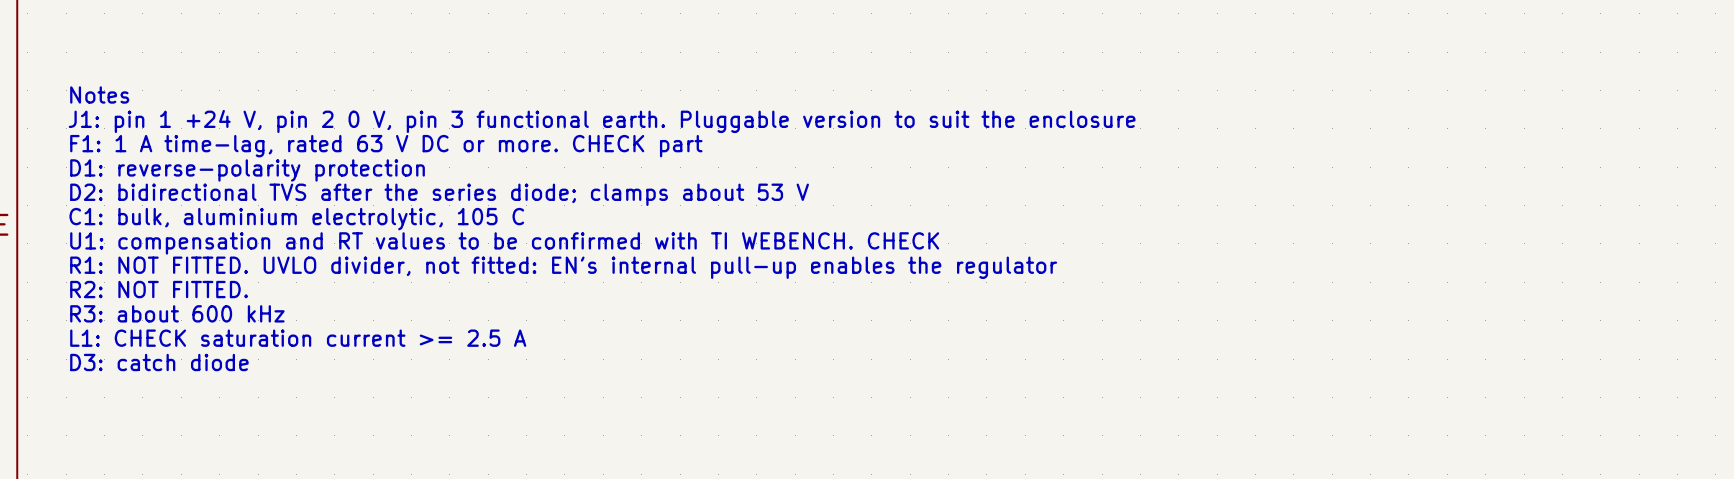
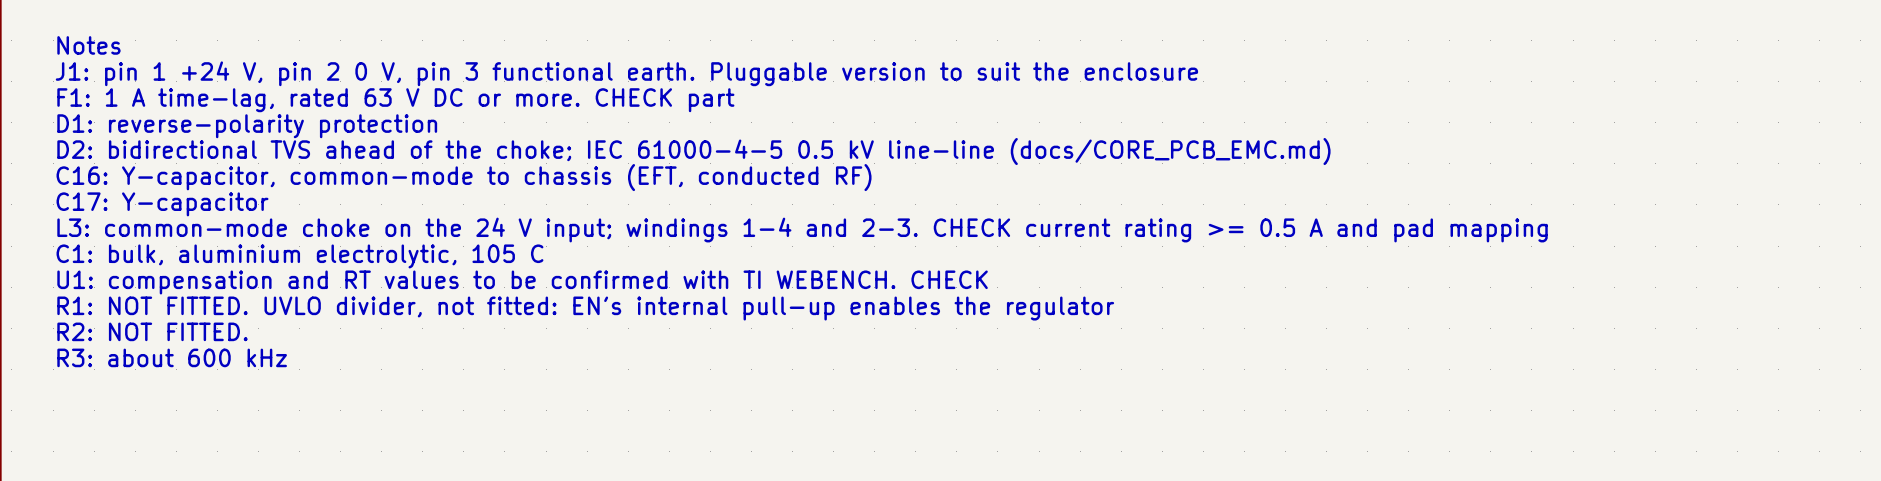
text: D2: bidirectional TVS after the series diode; clamps about 53 V (439, 194) -> D2: bidirectional TVS ahead of the choke; IEC 61000-4-5 0.5 kV line-line (docs/CORE_PCB_EMC.md) (693, 151)
text: C1: bulk, aluminium electrolytic, 105 C (296, 219) -> C16: Y-capacitor, common-mode to chassis (EFT, conducted RF) (464, 177)
text: U1: compensation and RT values to be confirmed with TI WEBENCH. CHECK (504, 243) -> C17: Y-capacitor (162, 204)
text: R1: NOT FITTED. UVLO divider, not fitted: EN's internal pull-up enables the regulator (563, 267) -> L3: common-mode choke on the 24 V input; windings 1-4 and 2-3. CHECK current rating >= 0.5 A and pad mapping (802, 230)
text: R2: NOT FITTED. (159, 289) -> C1: bulk, aluminium electrolytic, 105 C (299, 256)
text: R3: about 600 kHz (177, 313) -> U1: compensation and RT values to be confirmed with TI WEBENCH. CHECK (522, 282)
text: L1: CHECK saturation current >= 2.5 A (298, 338) -> R1: NOT FITTED. UVLO divider, not fitted: EN's internal pull-up enables the regulator (585, 308)
text: D3: catch diode (159, 362) -> R2: NOT FITTED. (152, 331)
text: none -> R3: about 600 kHz (172, 357)

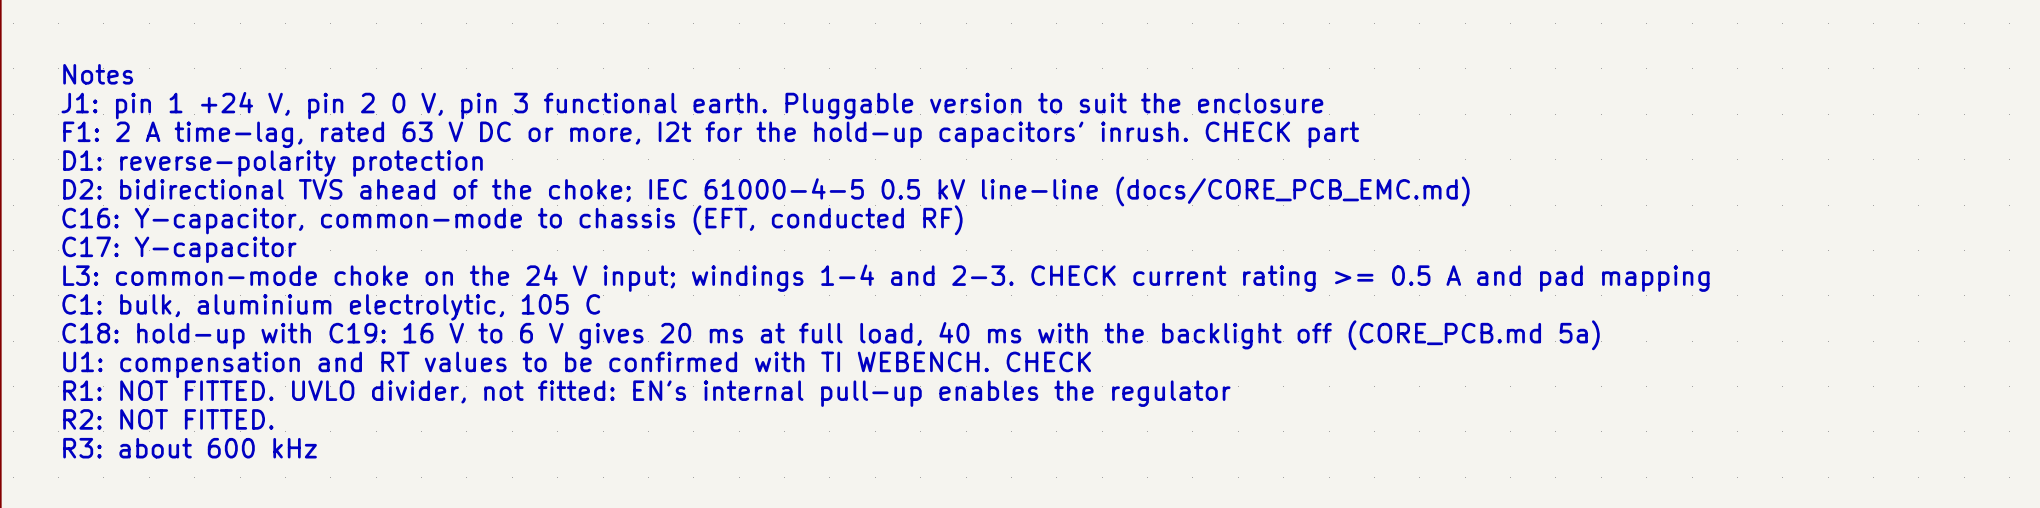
text: F1: 1 A time-lag, rated 63 V DC or more. CHECK part (395, 100) -> F1: 2 A time-lag, rated 63 V DC or more, I2t for the hold-up capacitors' inrush. CHECK part (711, 134)
text: U1: compensation and RT values to be confirmed with TI WEBENCH. CHECK (522, 282) -> C18: hold-up with C19: 16 V to 6 V gives 20 ms at full load, 40 ms with the backlight off (CORE_PCB.md 5a) (831, 335)
text: R1: NOT FITTED. UVLO divider, not fitted: EN's internal pull-up enables the regulator (585, 308) -> U1: compensation and RT values to be confirmed with TI WEBENCH. CHECK (577, 364)
text: R2: NOT FITTED. (152, 331) -> R1: NOT FITTED. UVLO divider, not fitted: EN's internal pull-up enables the regulator (646, 393)
text: R3: about 600 kHz (172, 357) -> R2: NOT FITTED. (168, 419)
text: none -> R3: about 600 kHz (190, 448)

